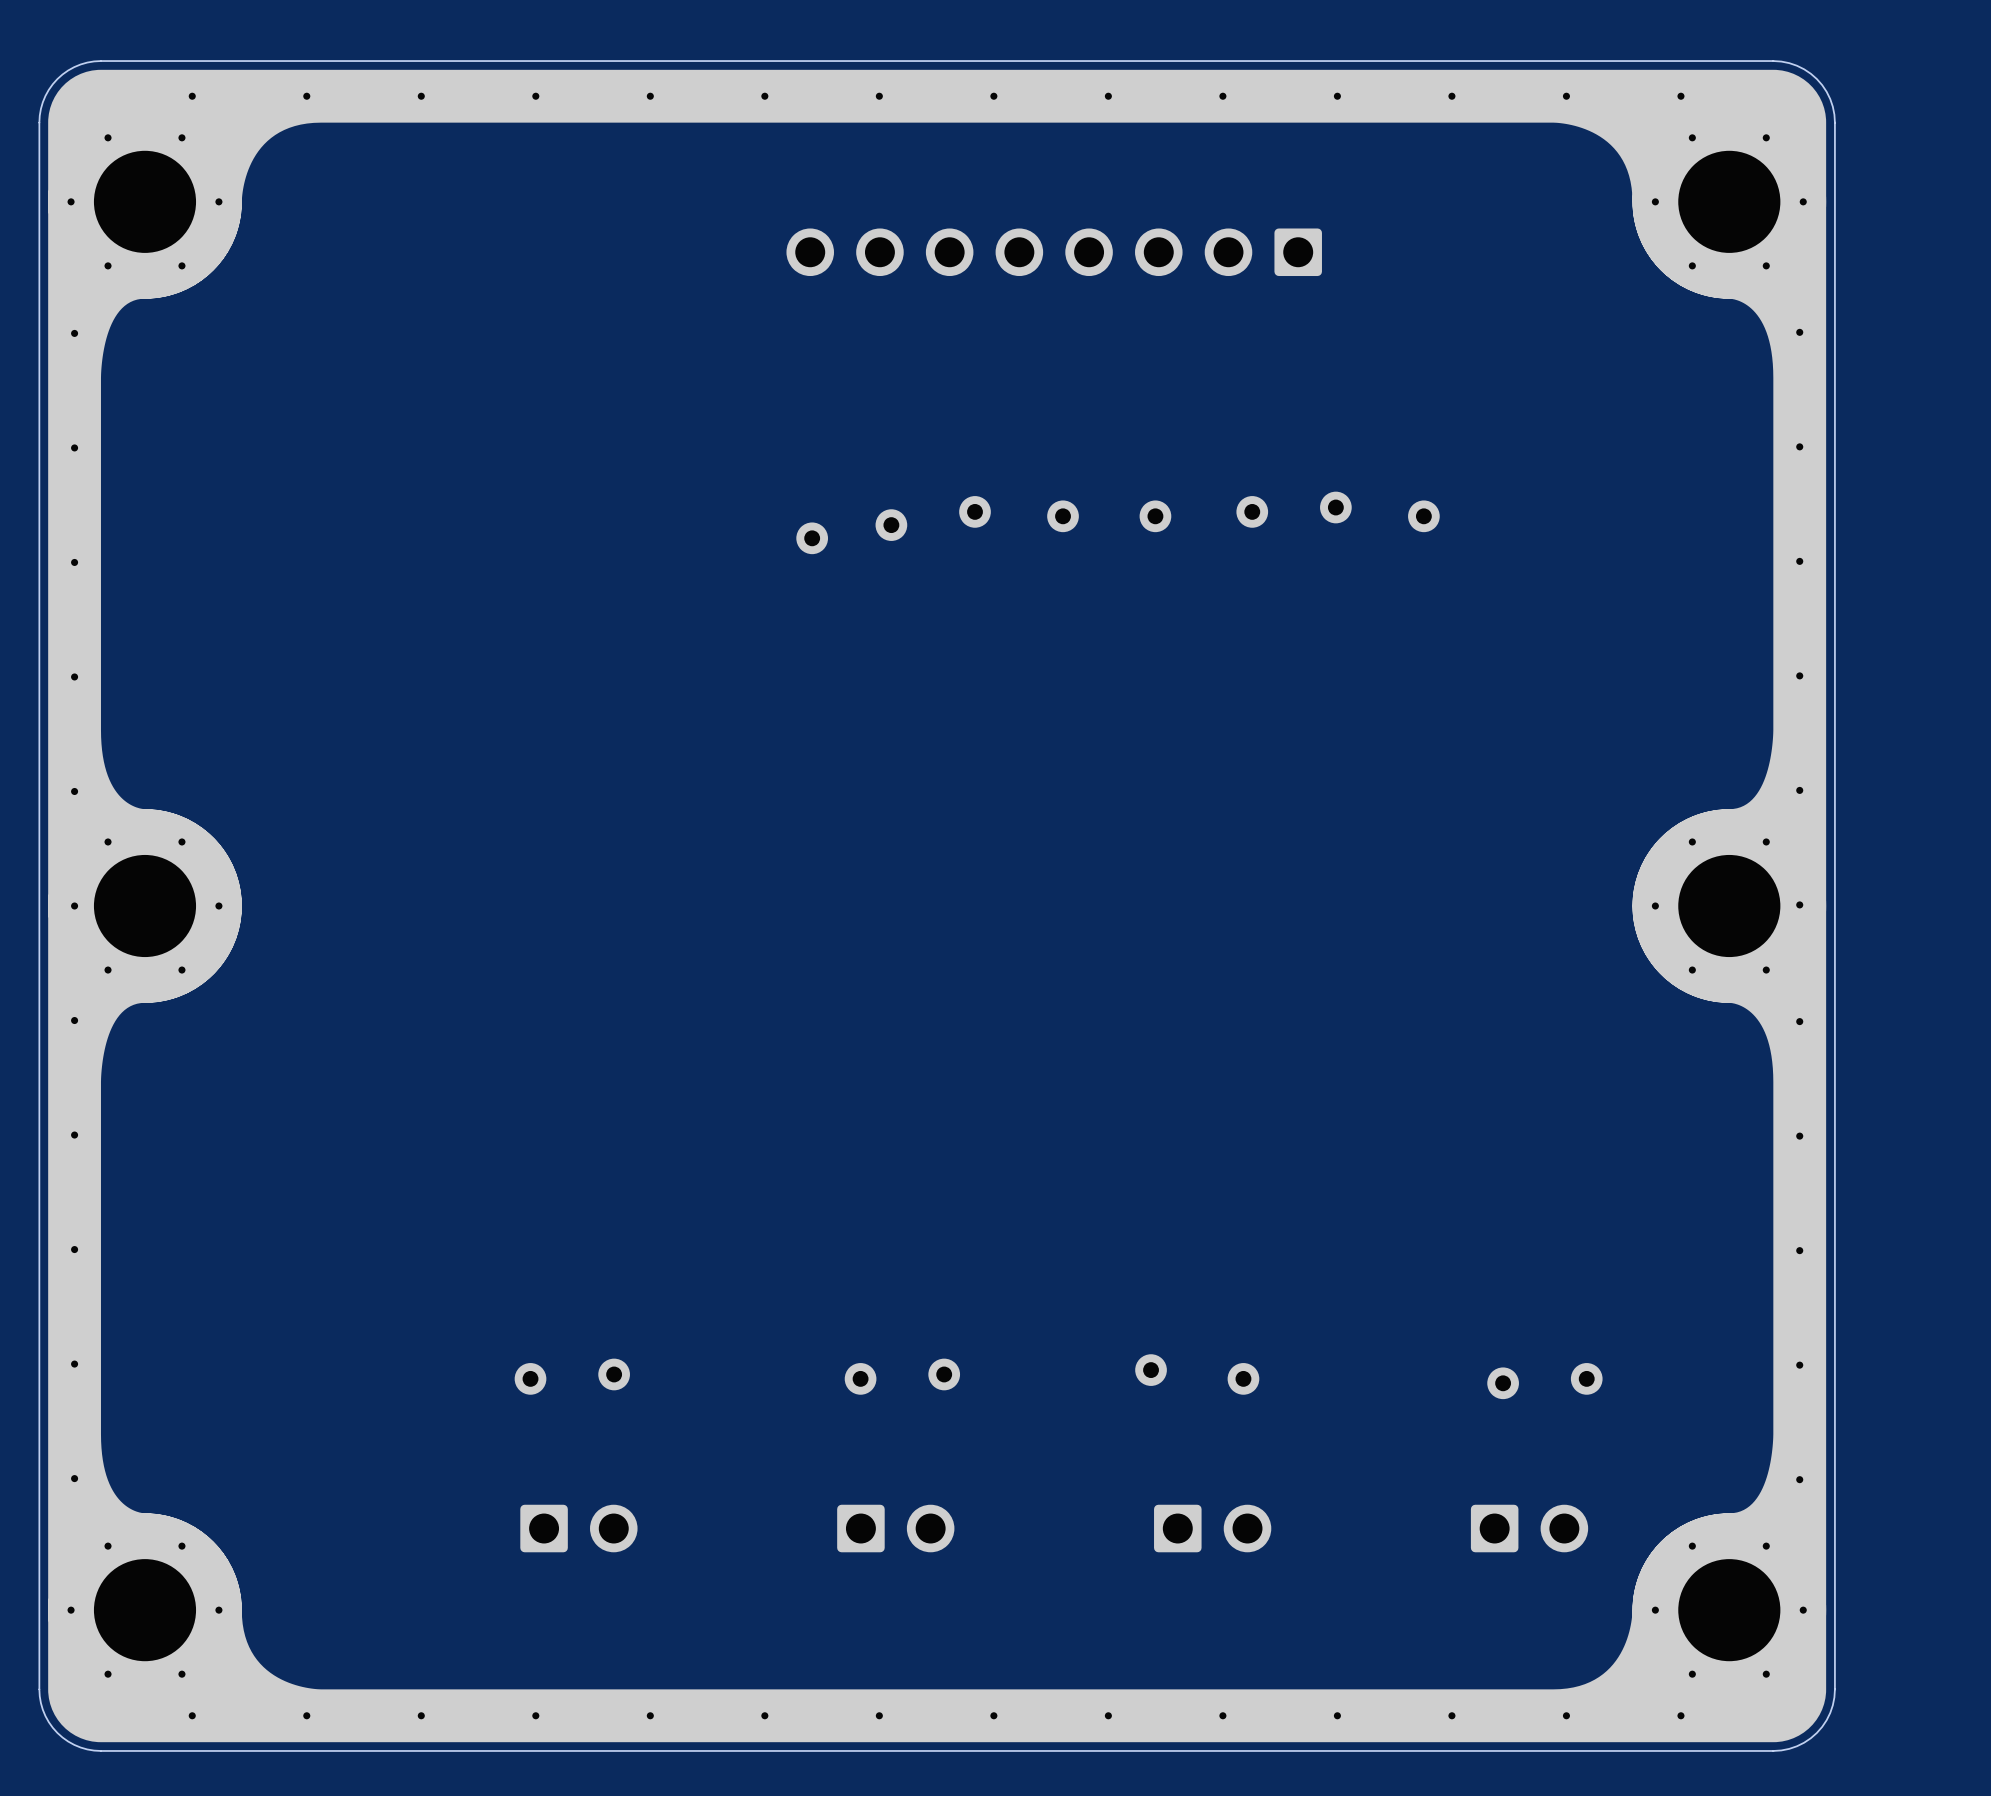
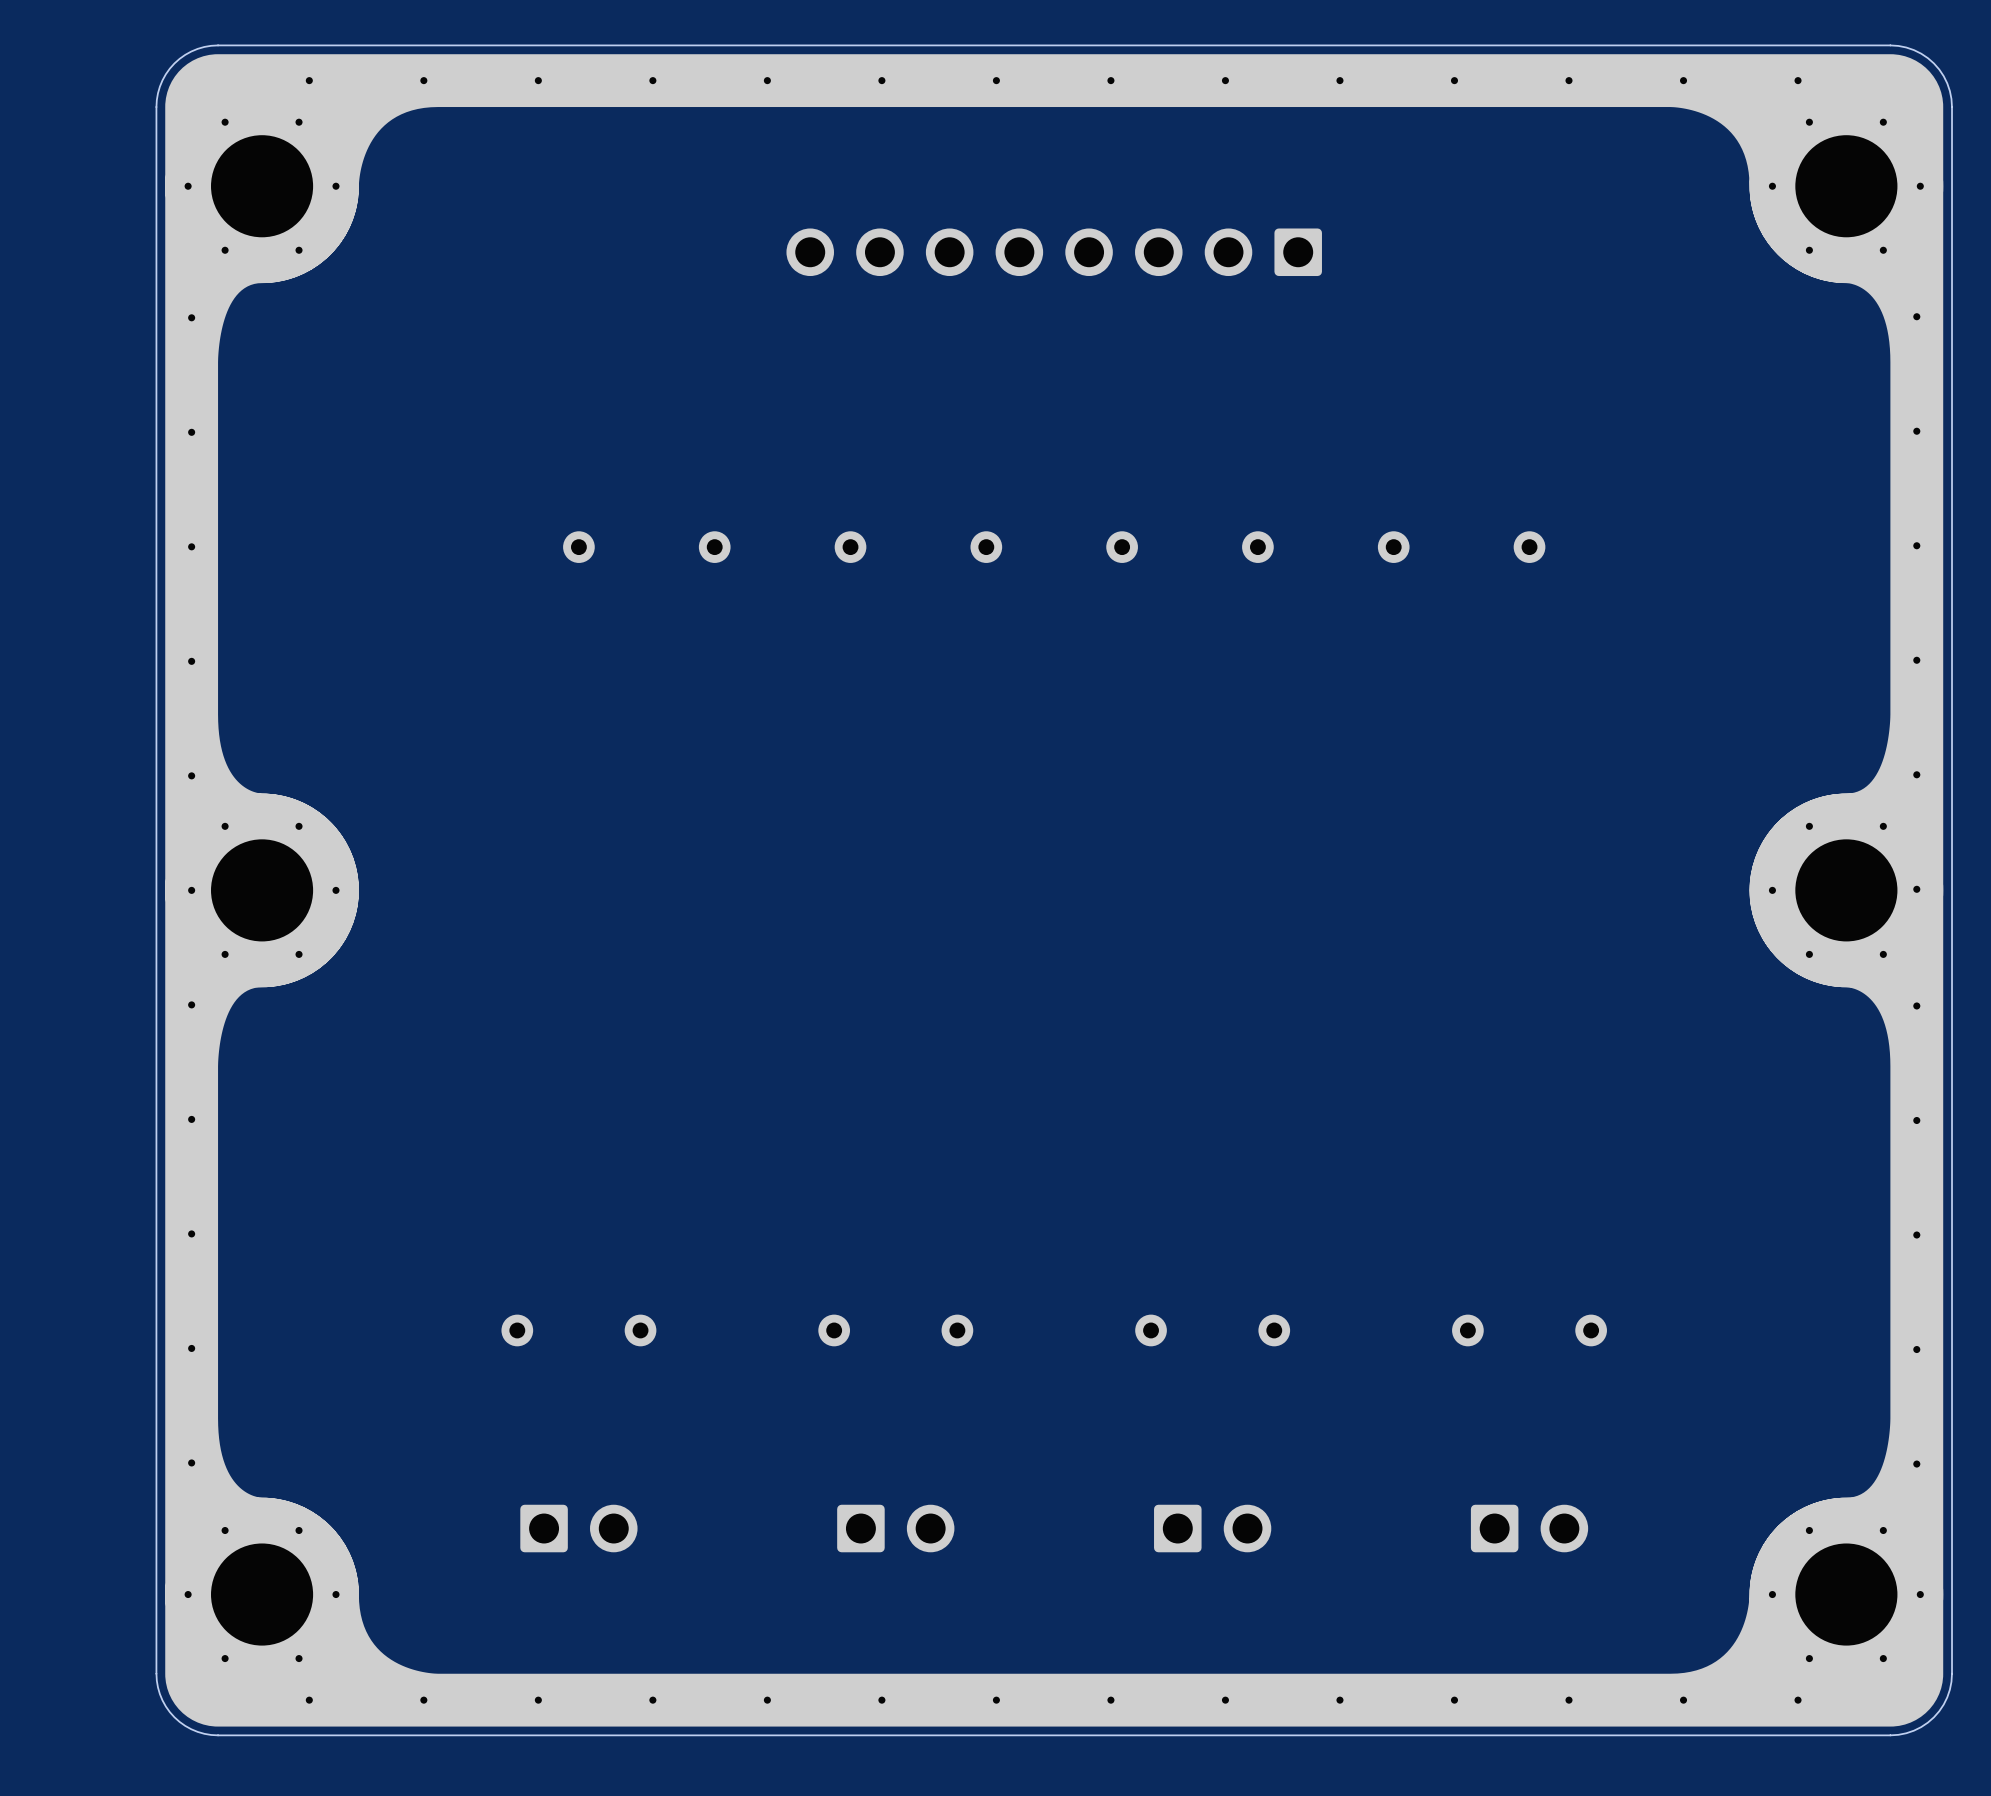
part: (1335, 507) -> none
part position: (975, 511) -> (986, 547)
part position: (1252, 511) -> (1257, 547)
part: (1063, 516) -> none
part: (1155, 516) -> none
part: (1423, 516) -> none
part: (891, 525) -> none
part: (812, 538) -> none
part: none -> (578, 547)
part: none -> (714, 547)
part: none -> (850, 547)
part: none -> (1122, 547)
part: none -> (1393, 547)
part: none -> (1529, 547)
part position: (937, 906) -> (1054, 890)
part: none -> (834, 1330)
part: none -> (1274, 1330)
part: none -> (1467, 1330)
part position: (1151, 1370) -> (1151, 1330)
part position: (614, 1374) -> (640, 1330)
part position: (944, 1374) -> (957, 1330)
part position: (530, 1378) -> (517, 1330)
part: (860, 1378) -> none
part: (1243, 1378) -> none
part position: (1586, 1378) -> (1591, 1330)
part: (1503, 1383) -> none

